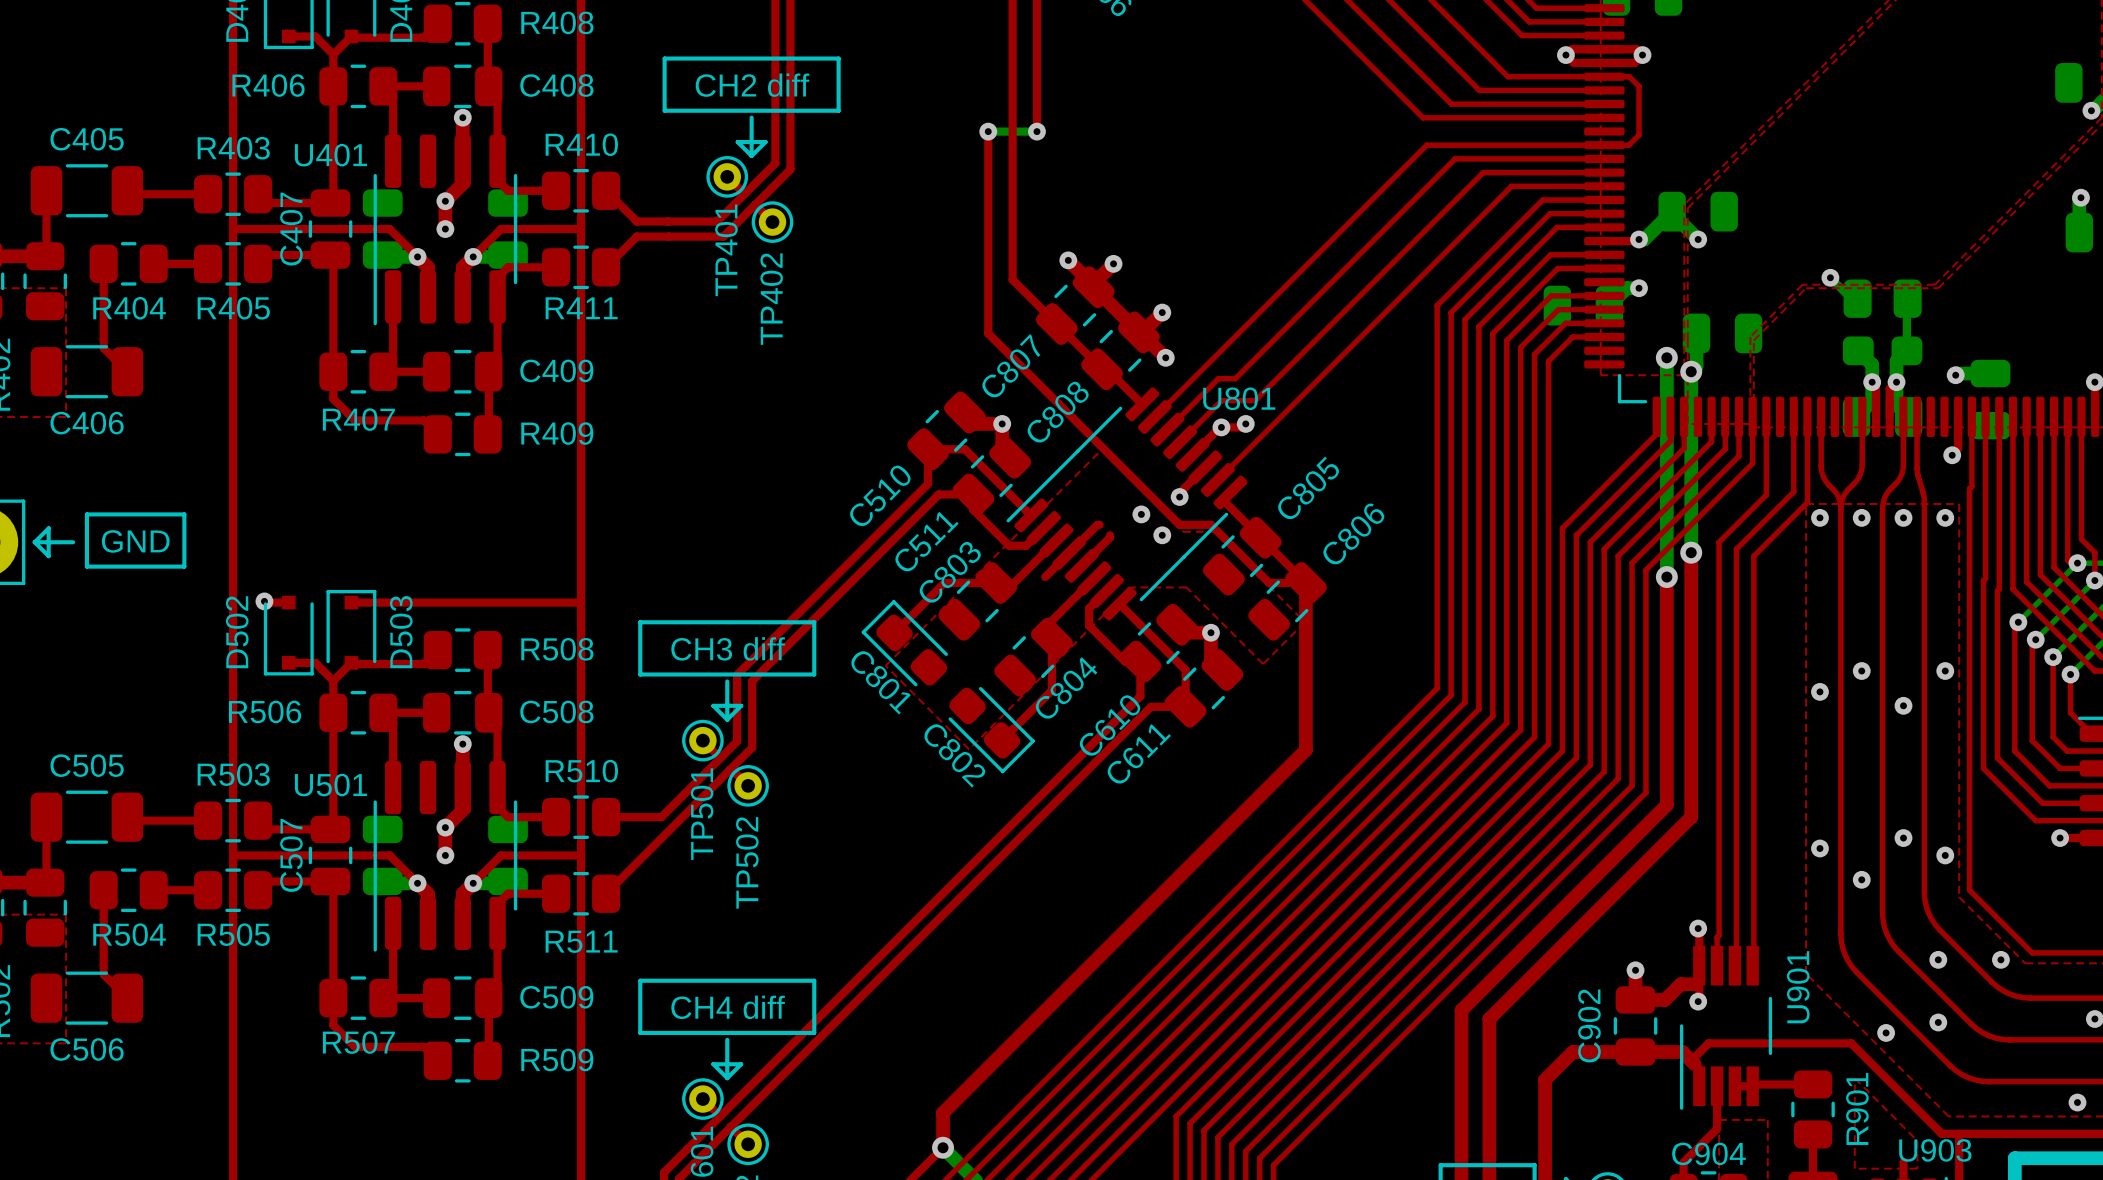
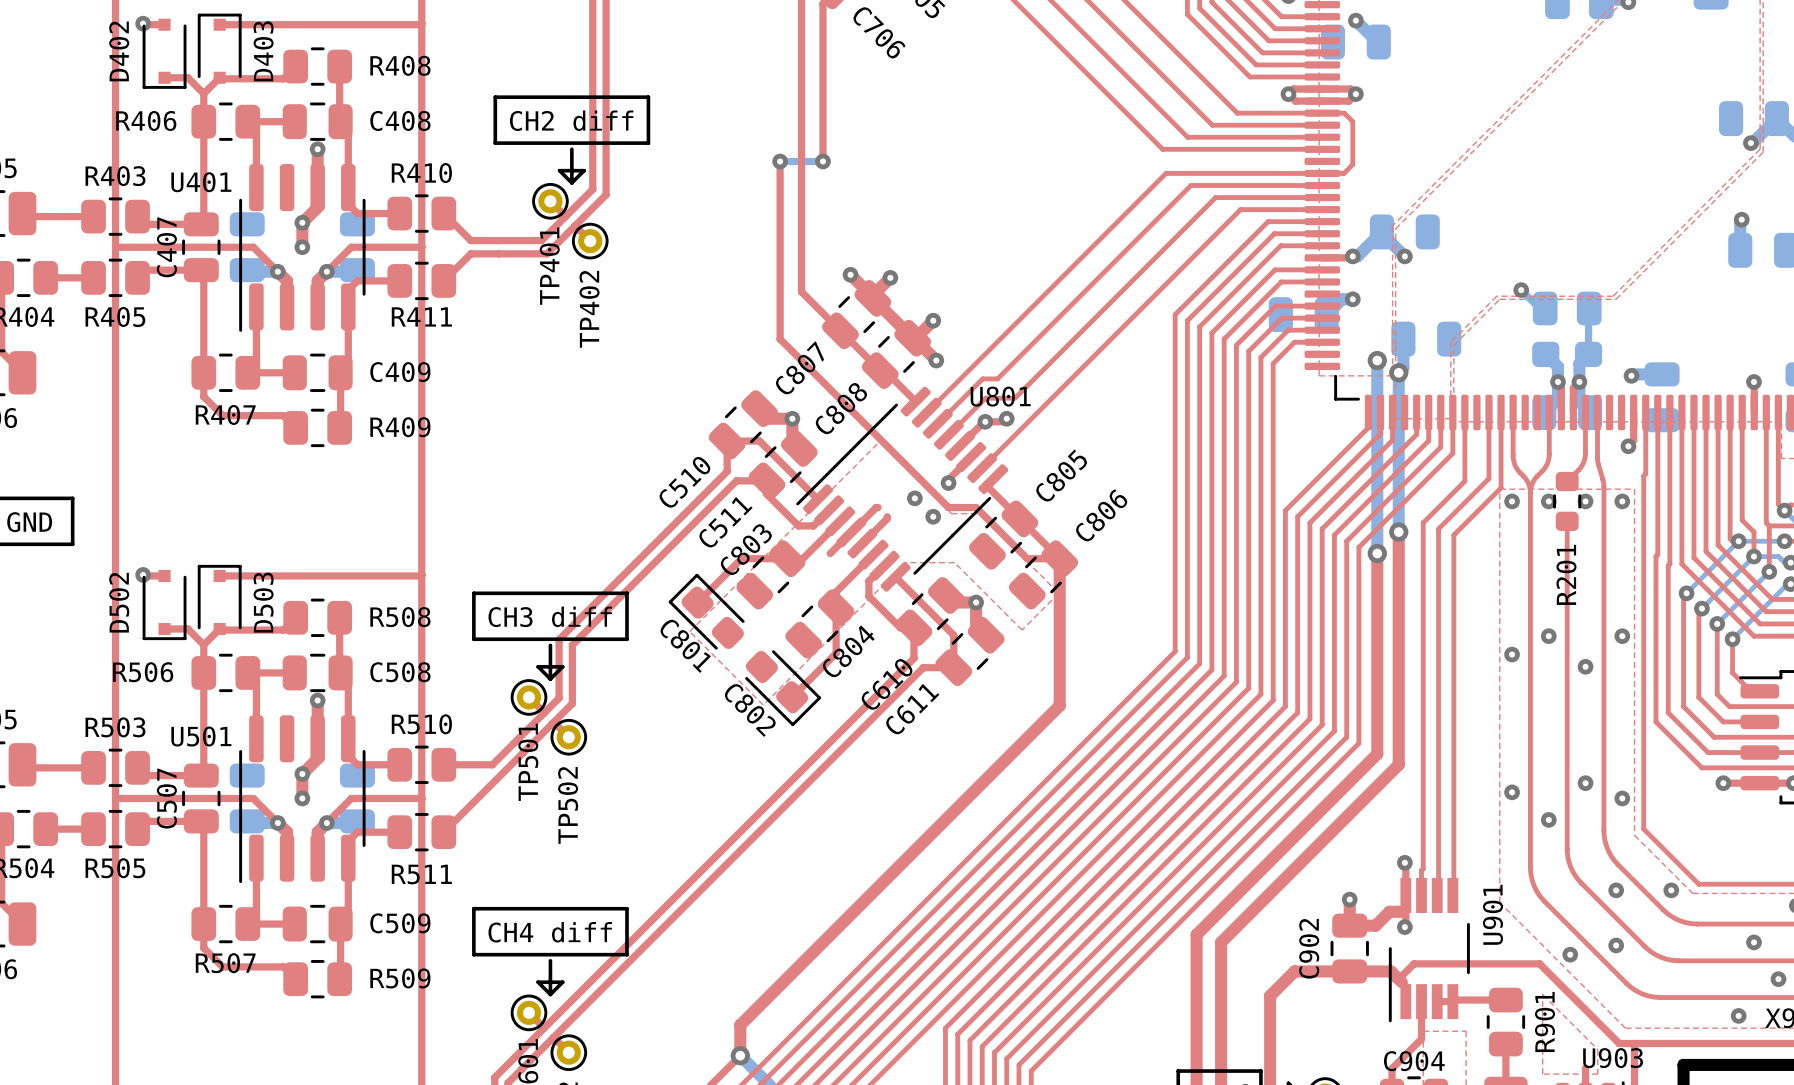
top track: (1903, 463) (1900, 477) (1883, 500) (1882, 540) -> (1585, 453) (1581, 466) (1567, 481)
R201: none -> (1567, 501)

